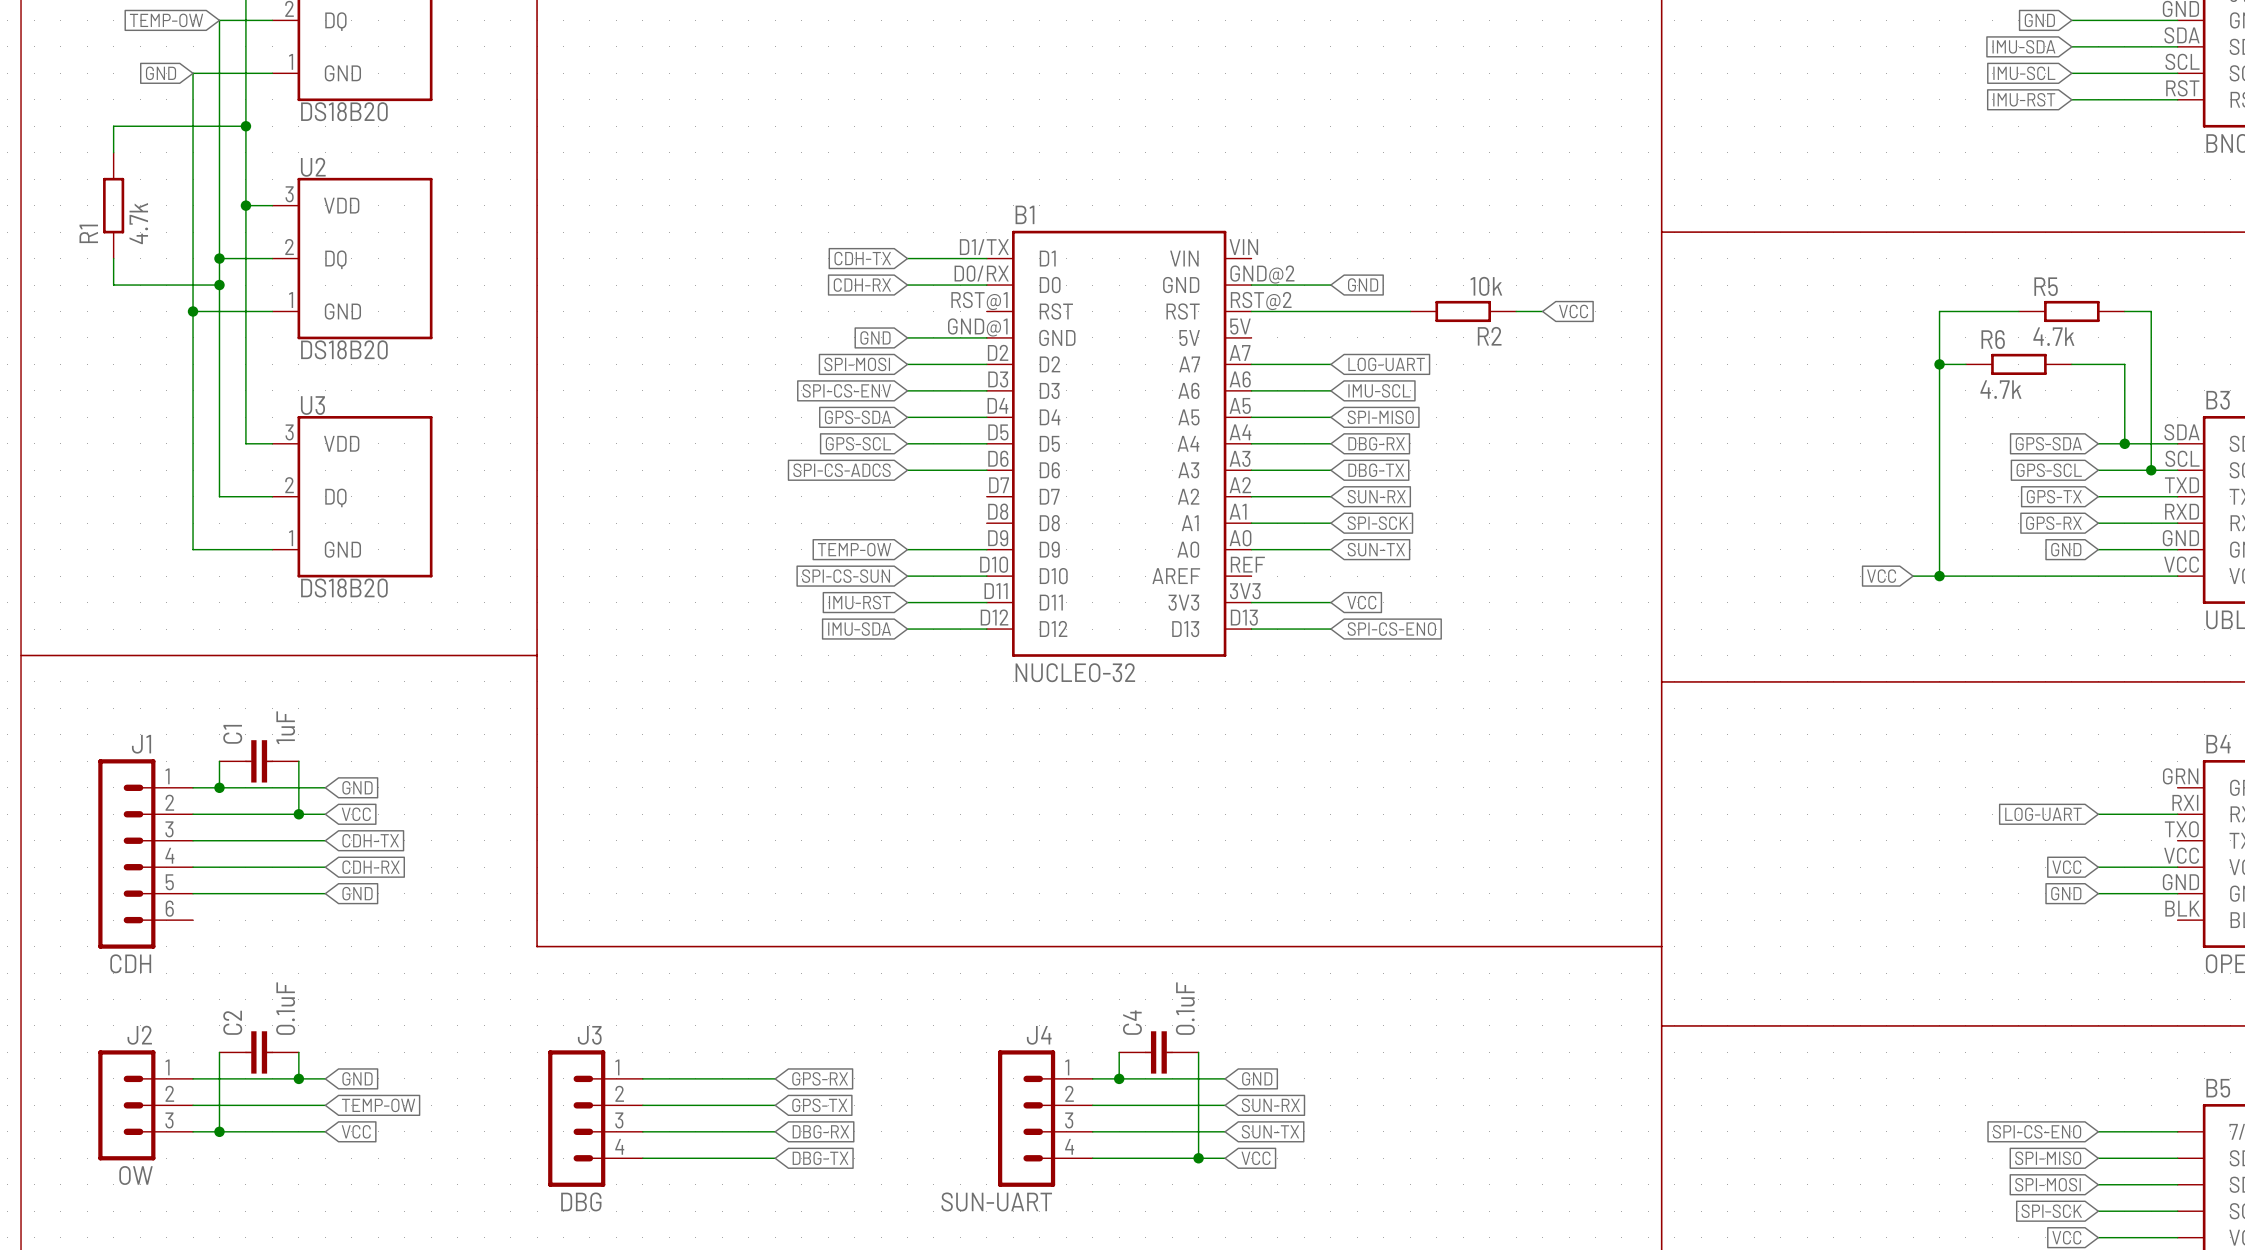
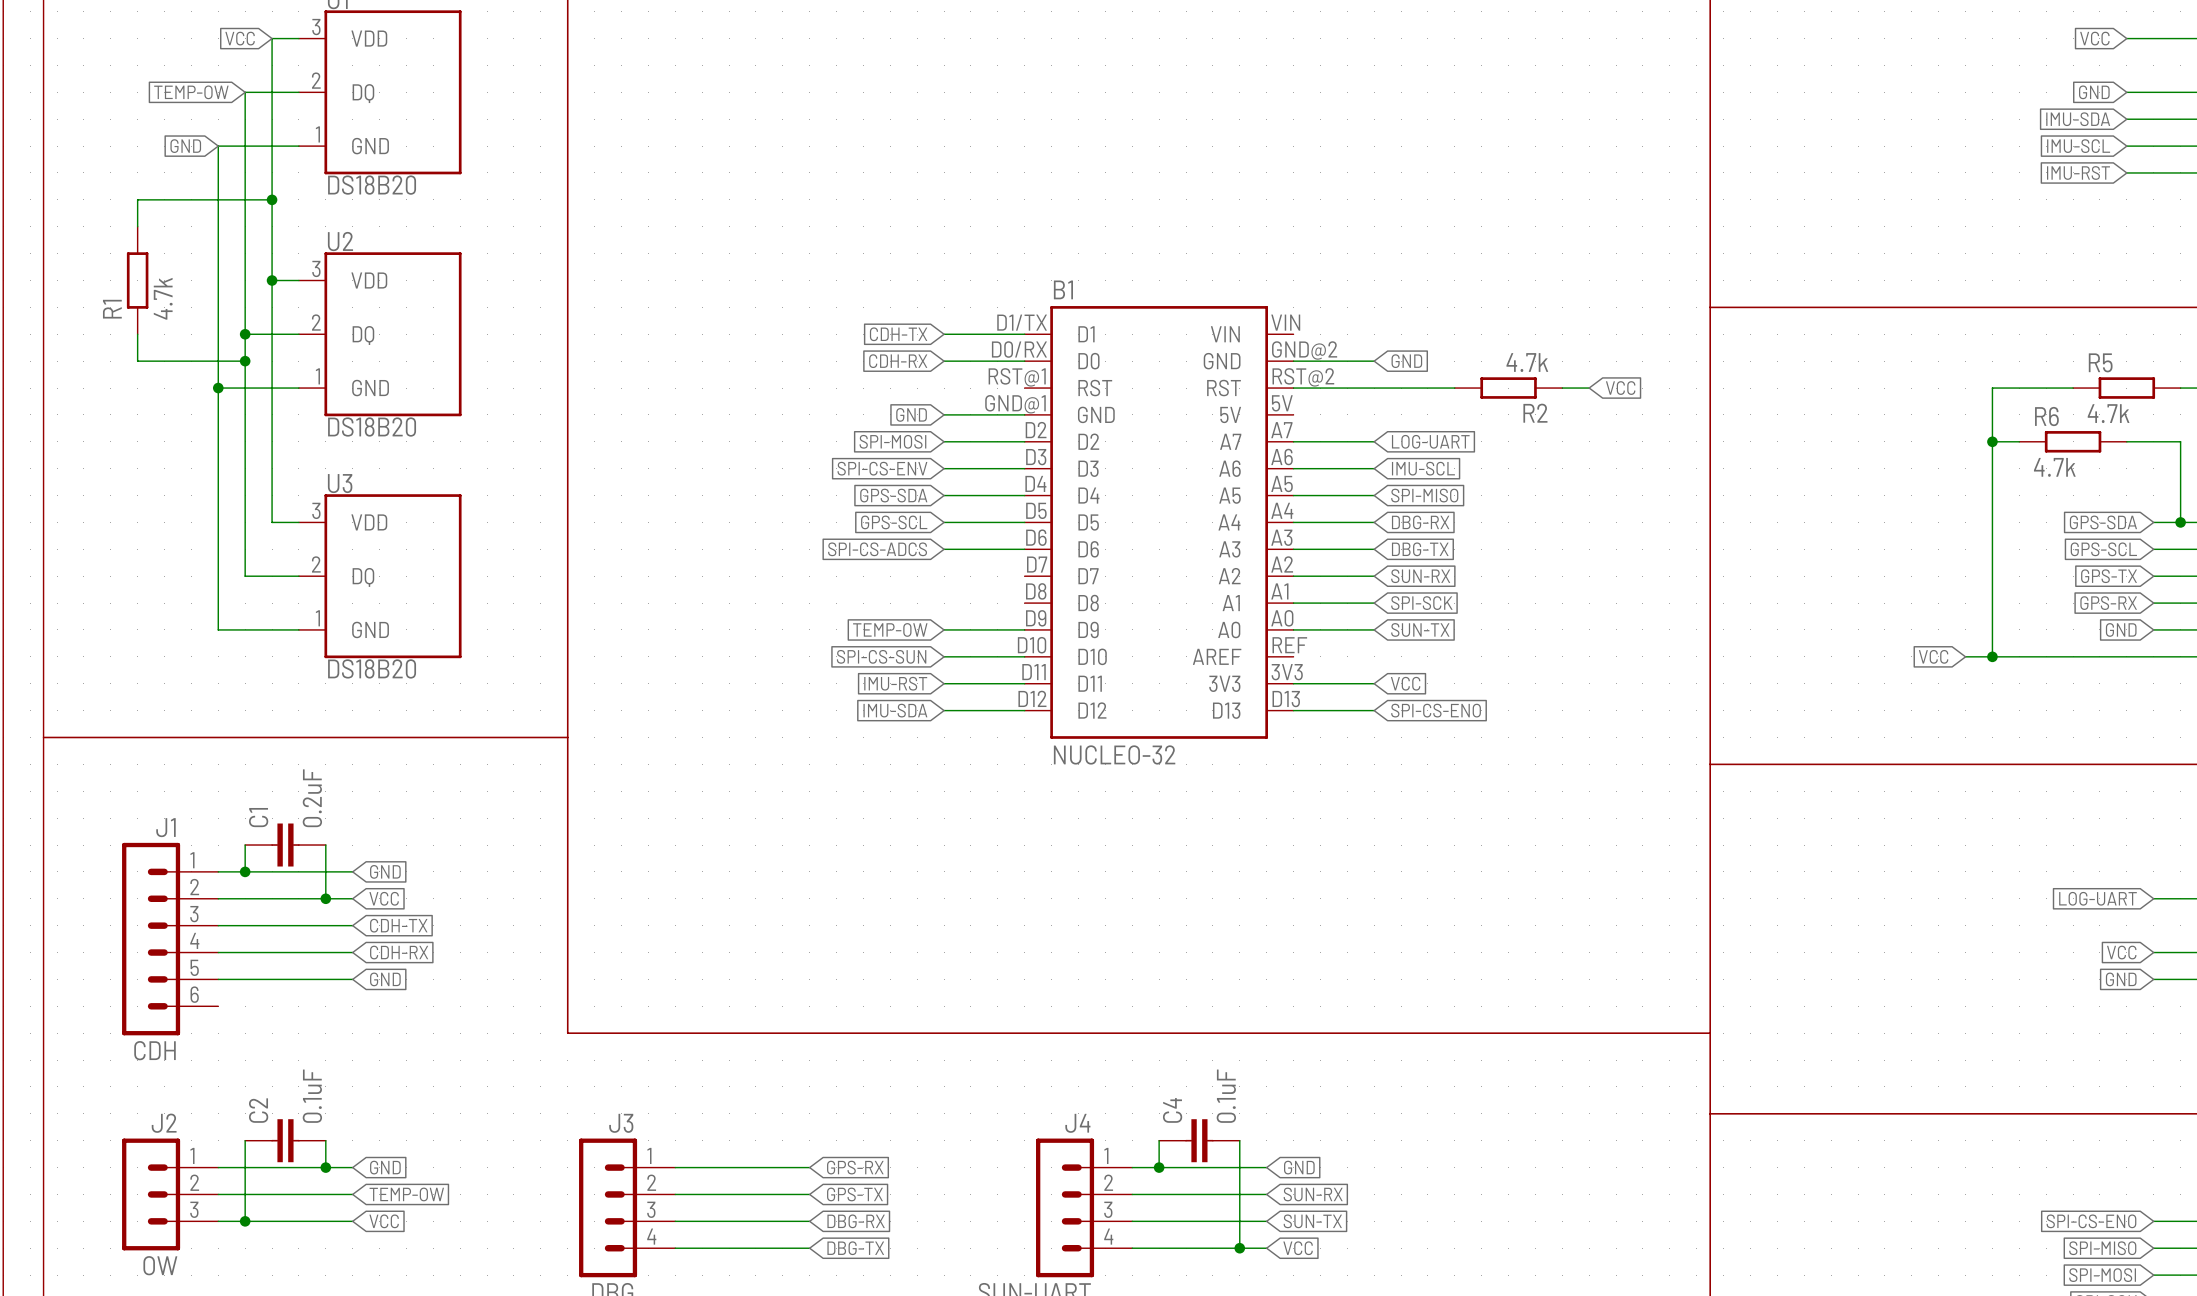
R2 value: 10k (1486, 286) -> 4.7k (1527, 362)
C1 value: 1uF (285, 727) -> 0.2uF (312, 798)

